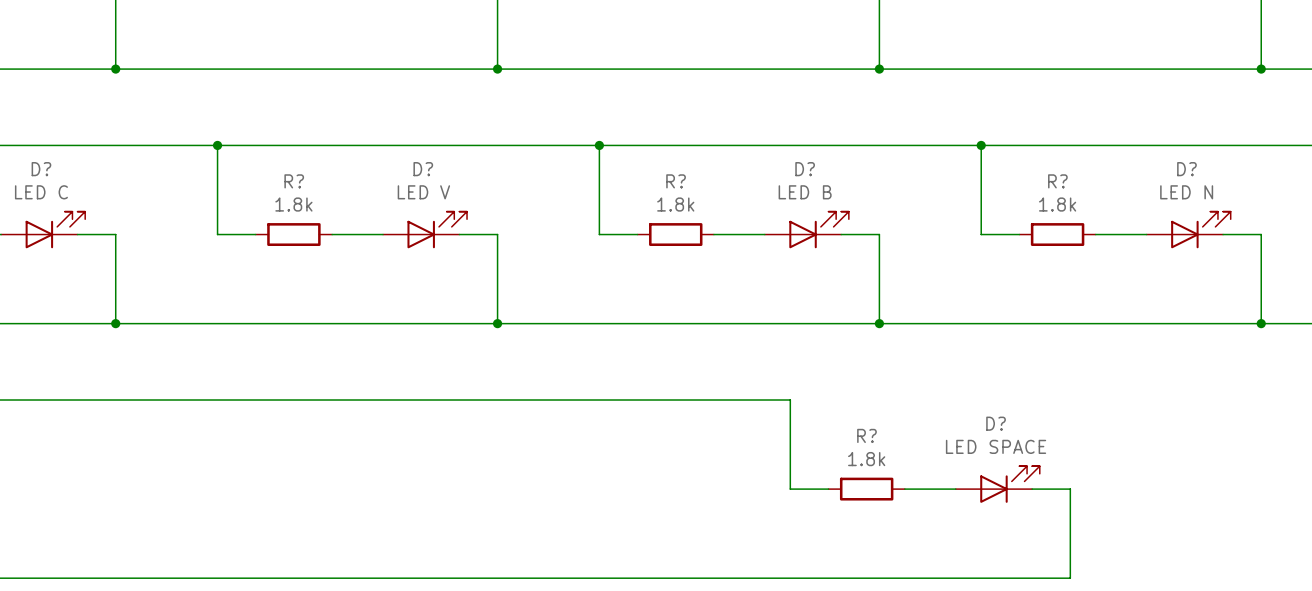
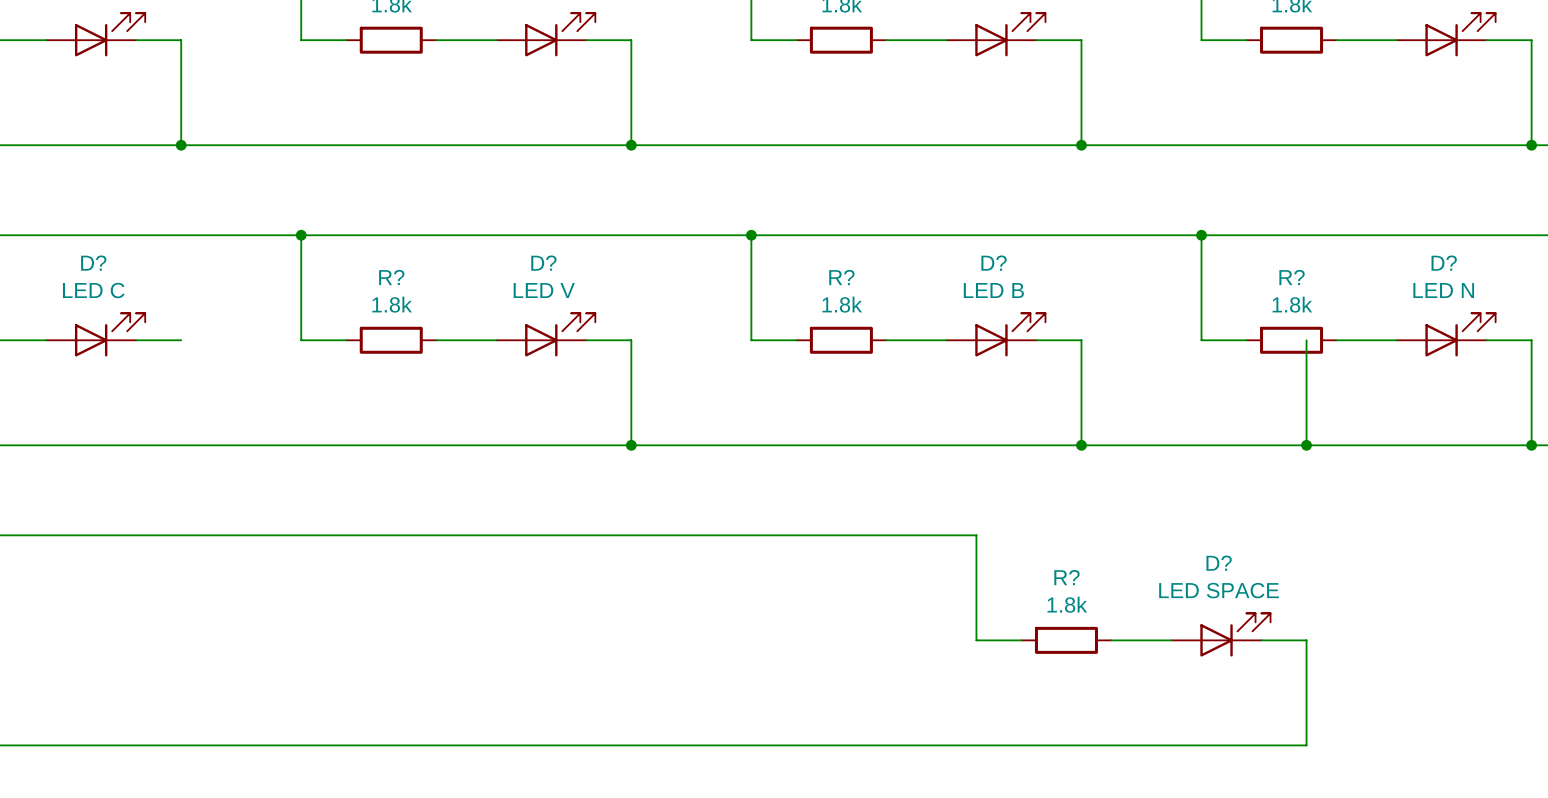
wire: (115, 234) (115, 323) -> none
wire: none -> (1306, 340) (1306, 445)
junction: (115, 323) -> none
junction: none -> (1306, 445)

